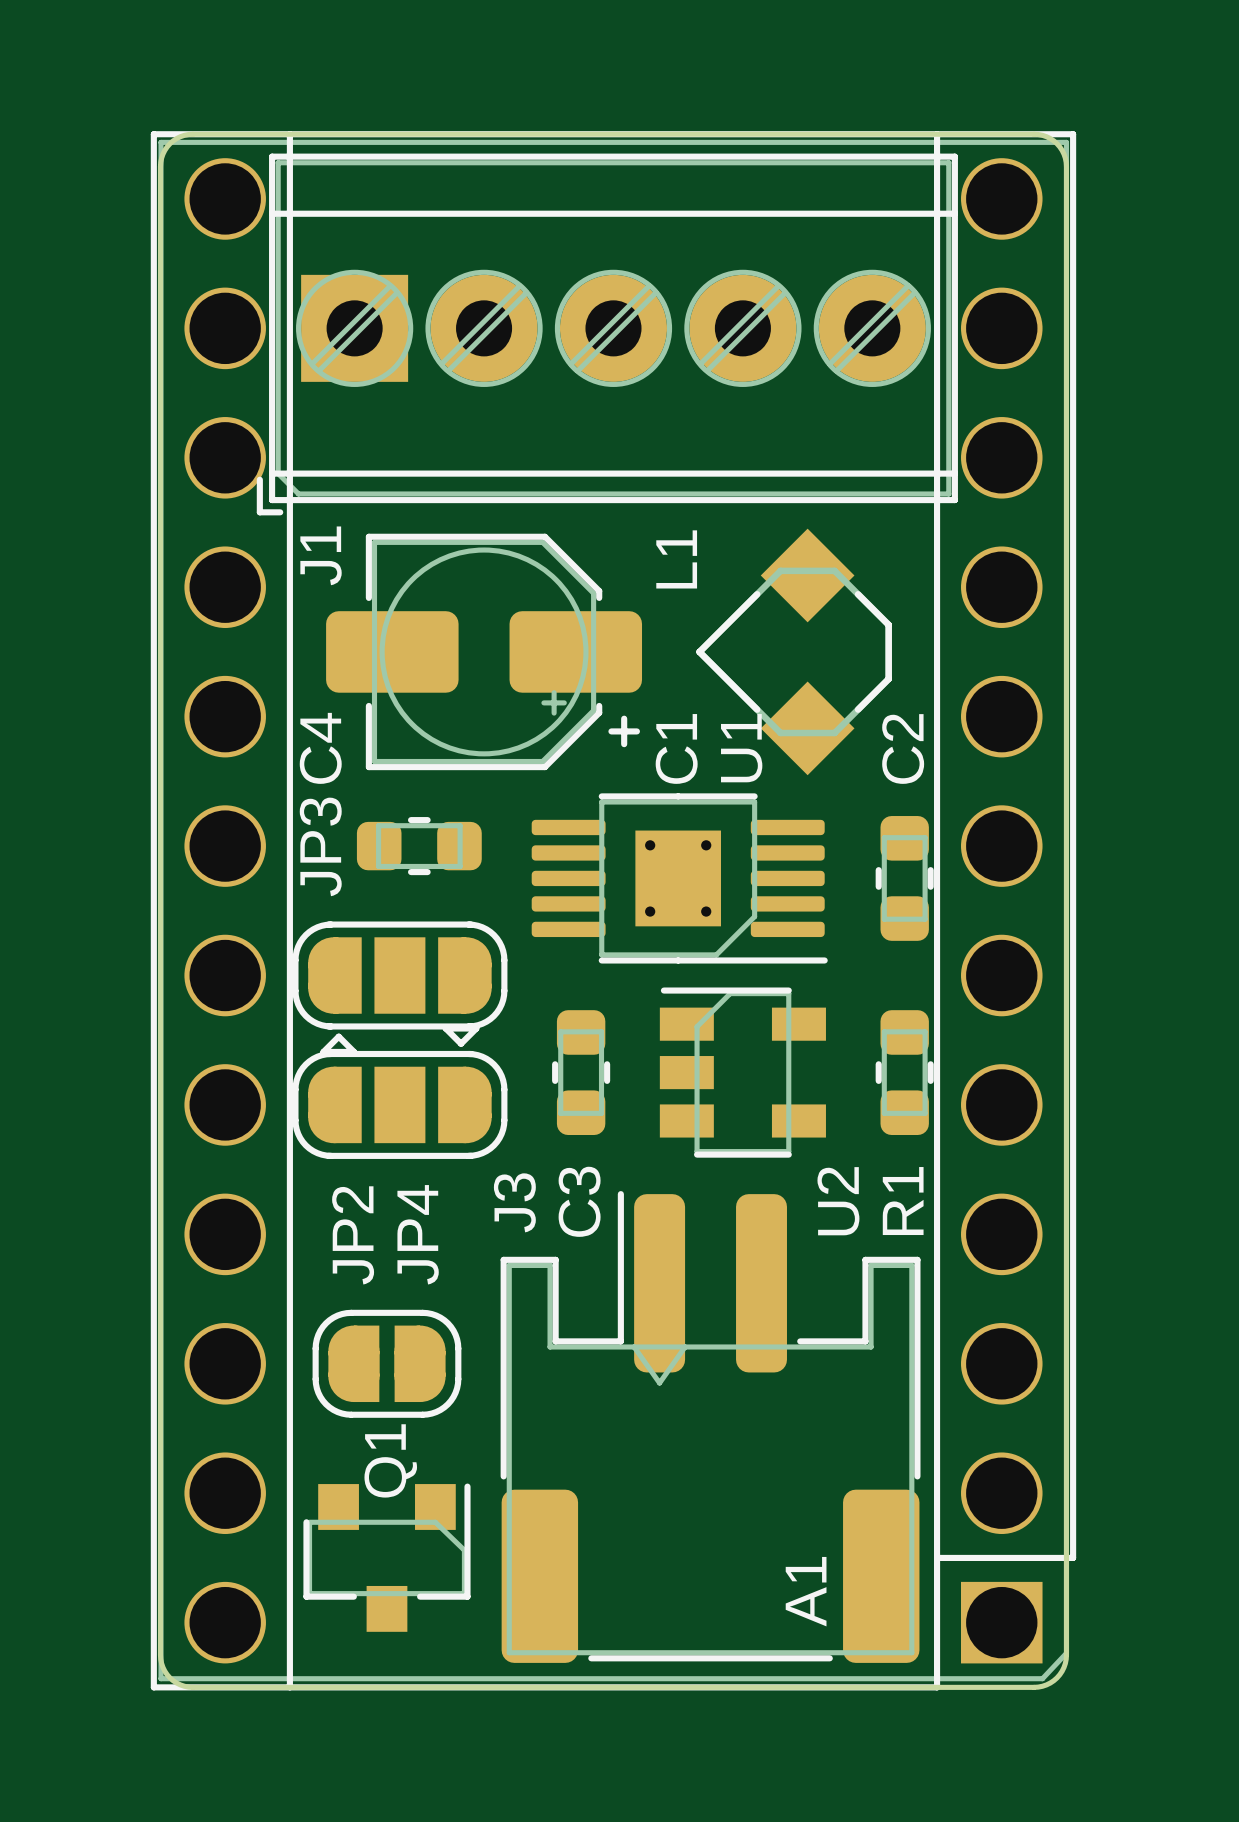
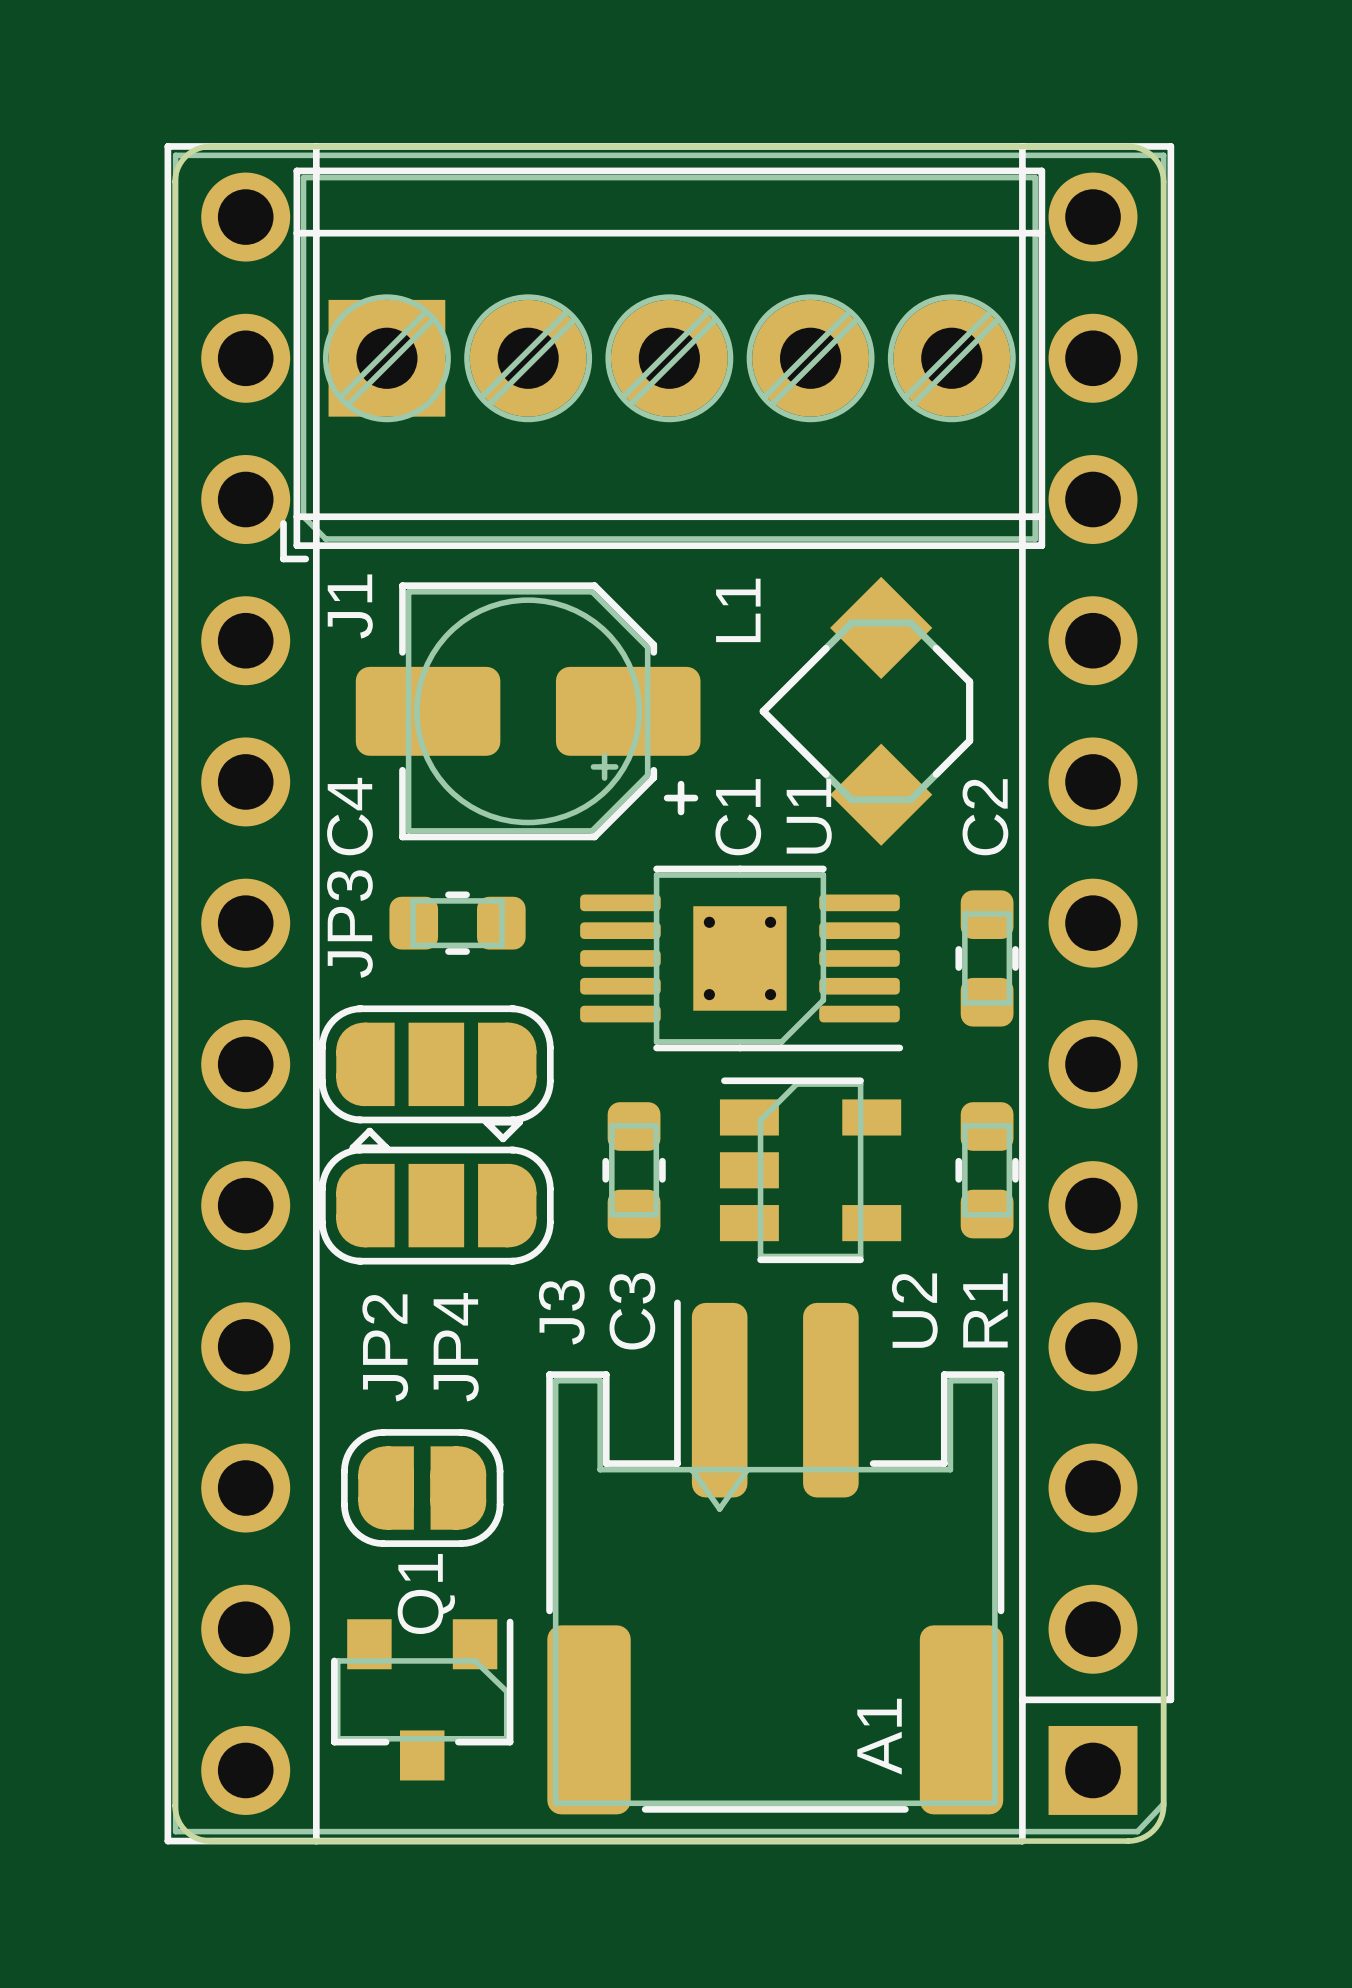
A1 footprint: [150, 131, 1077, 1691] -> [164, 143, 1175, 1845]

